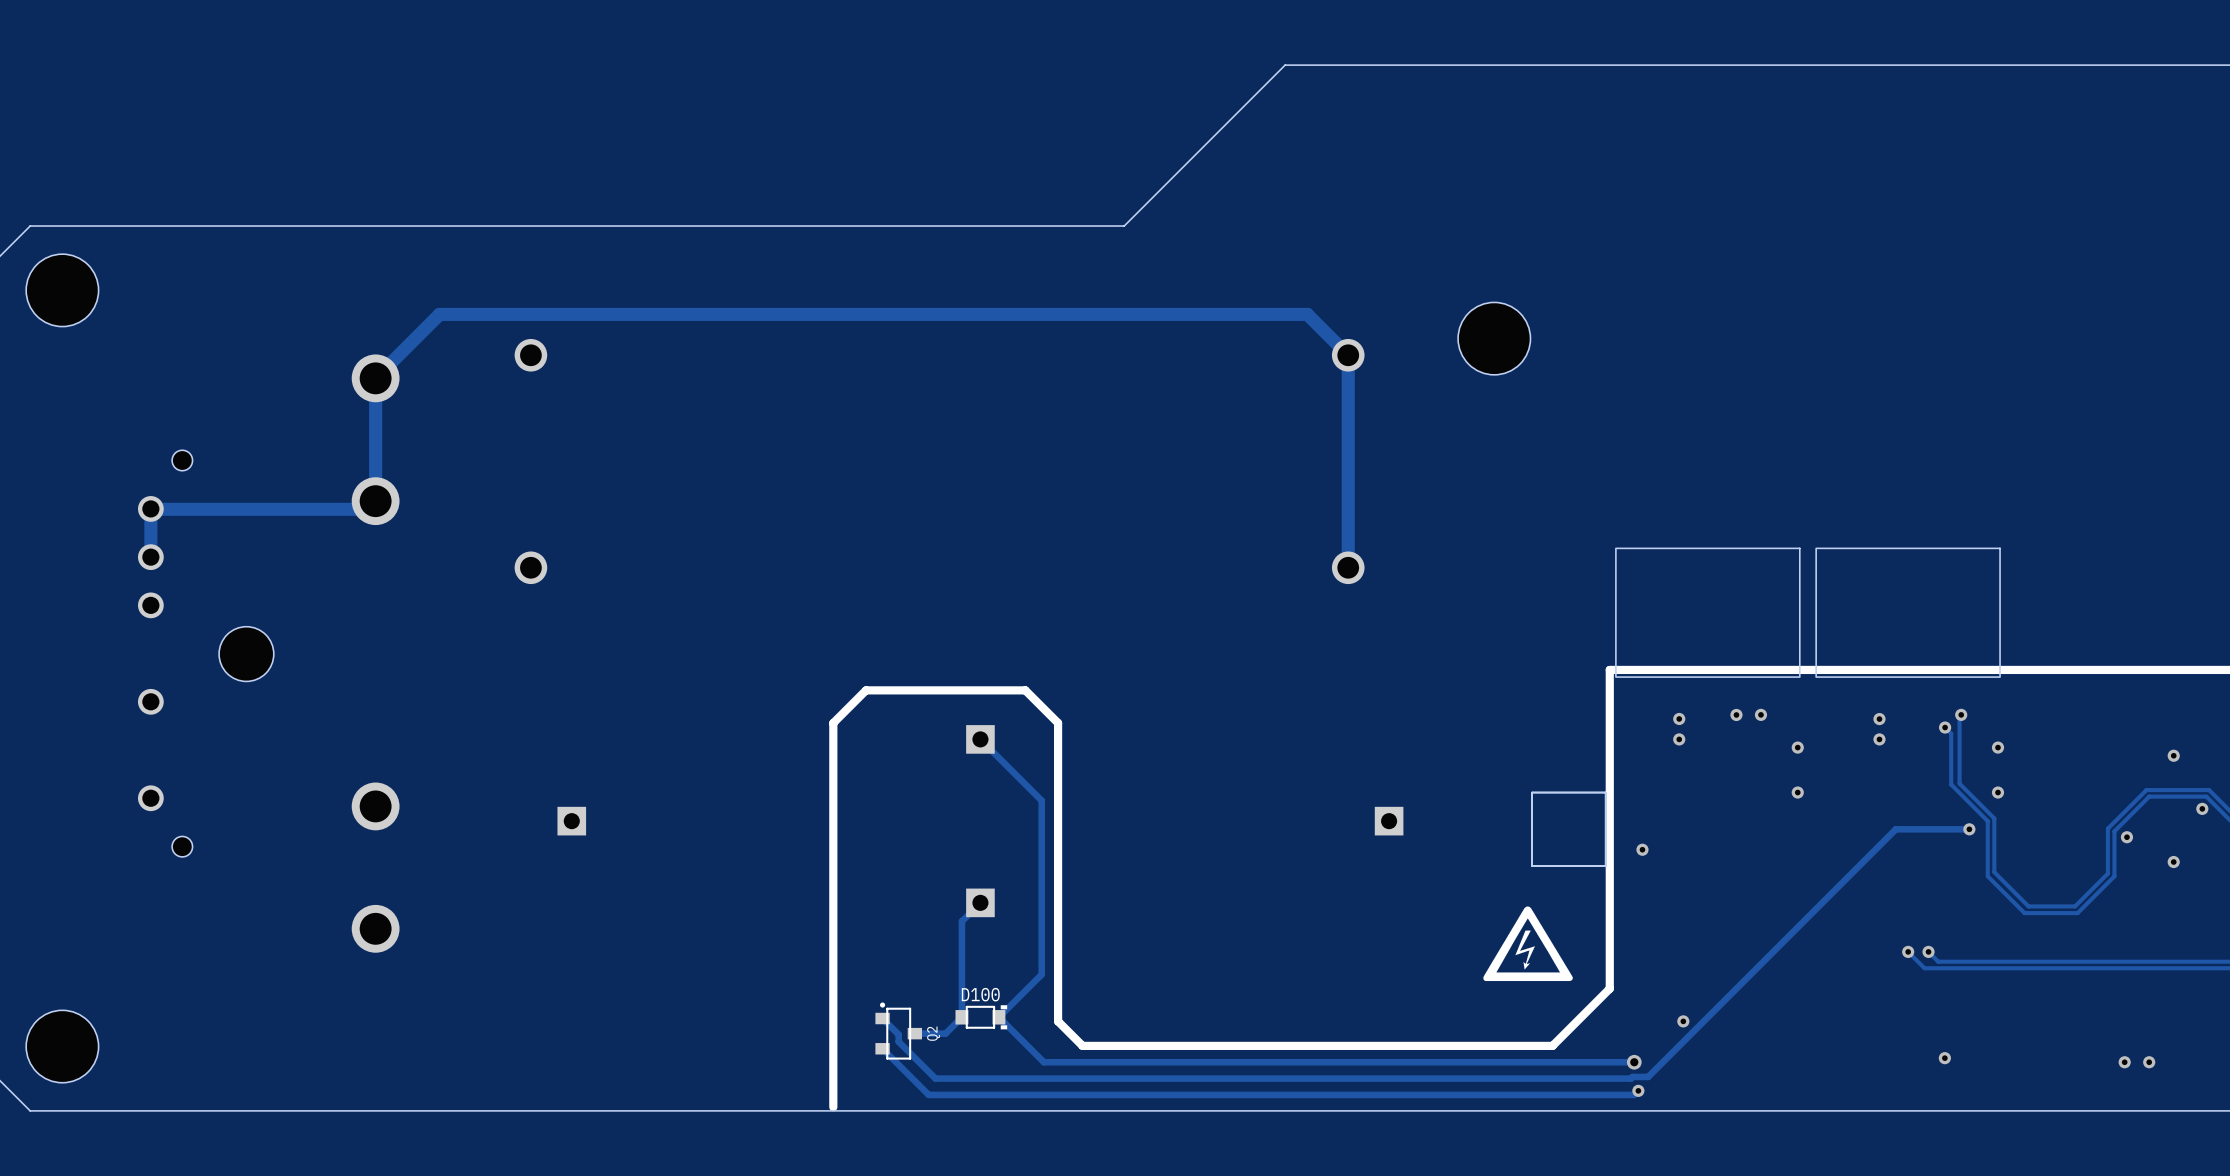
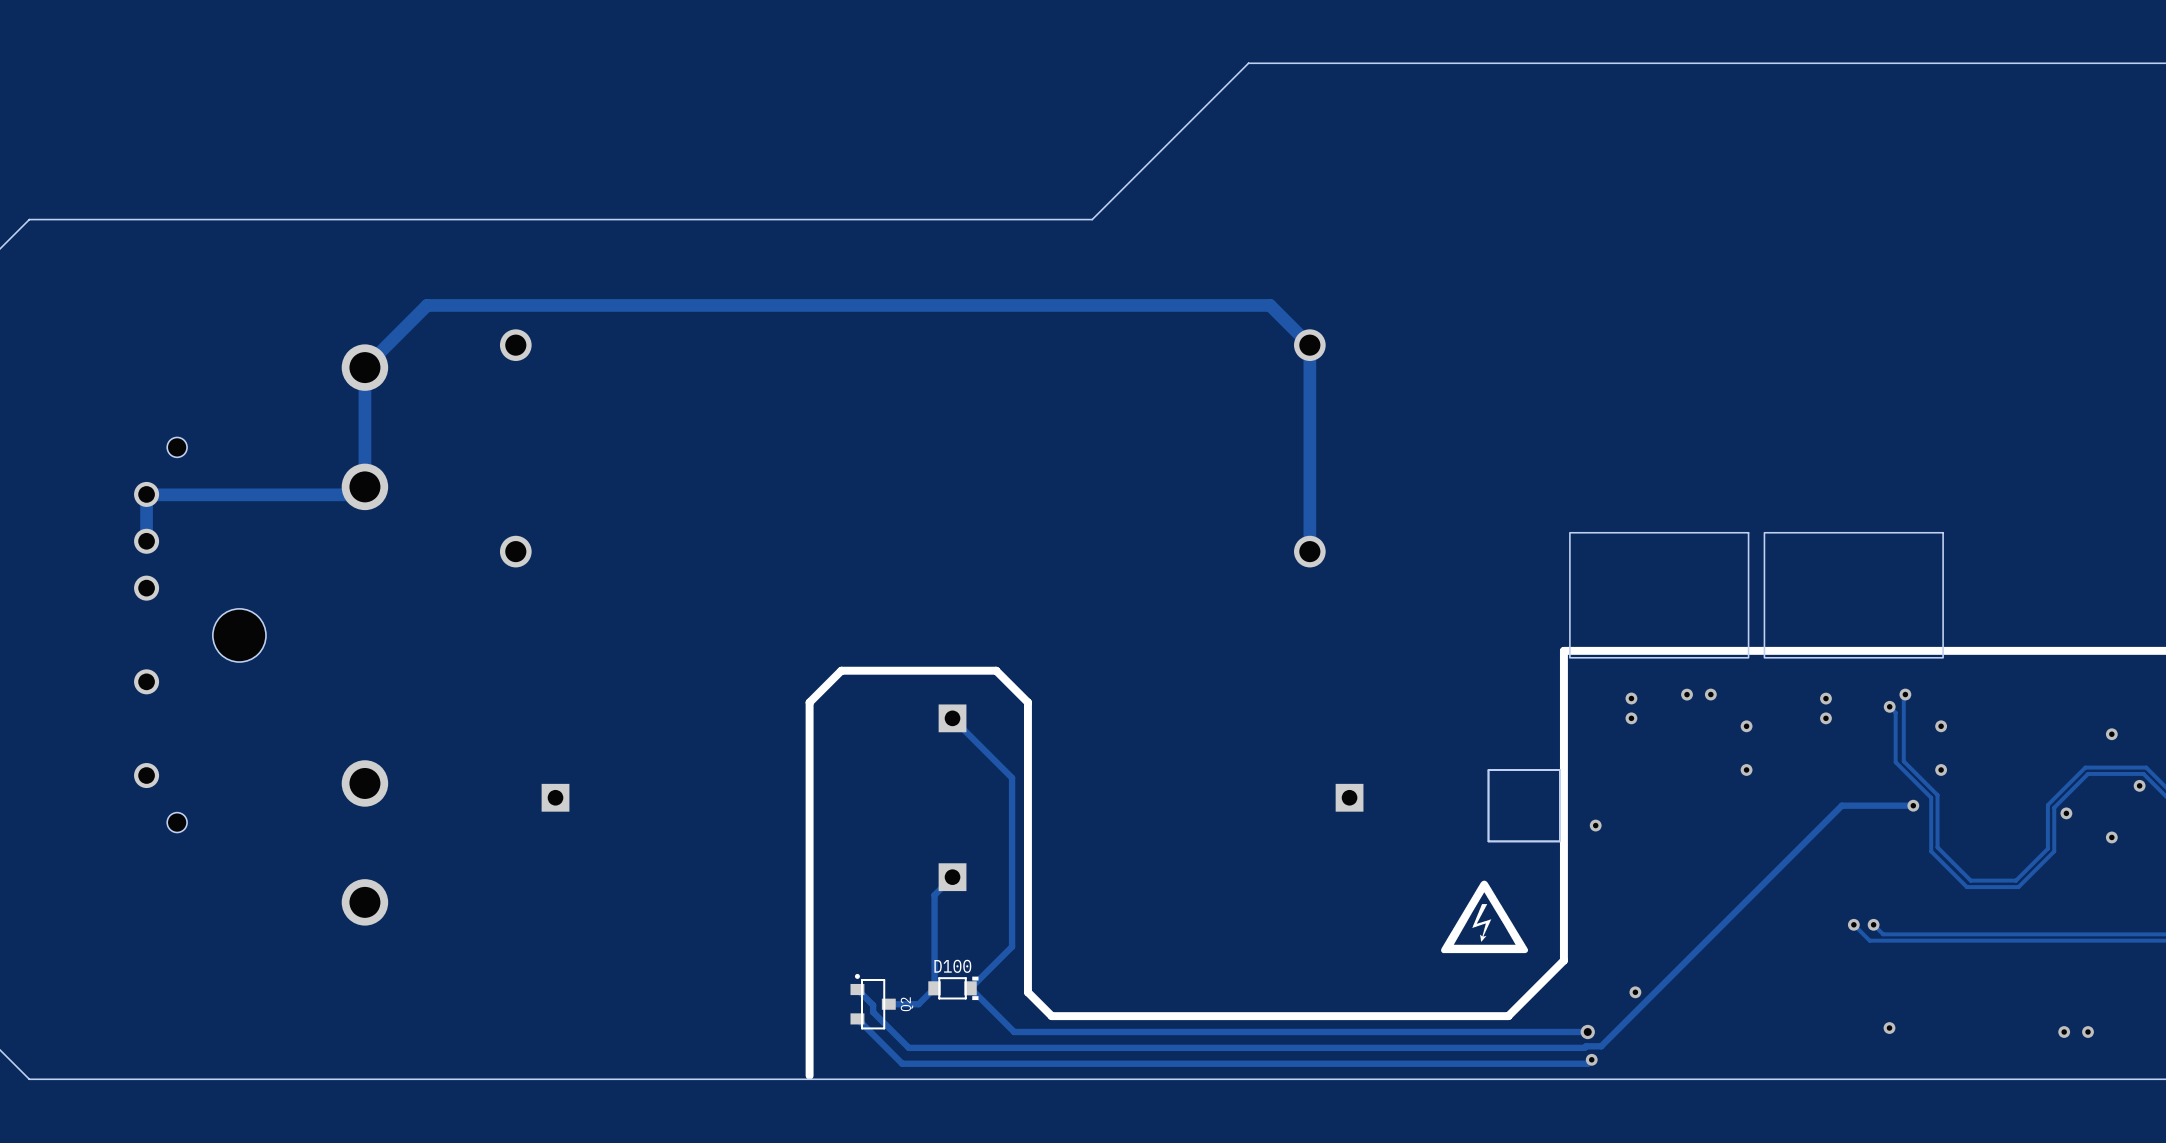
part: (62, 290) -> none
part: (1494, 338) -> none
part: (62, 1046) -> none

